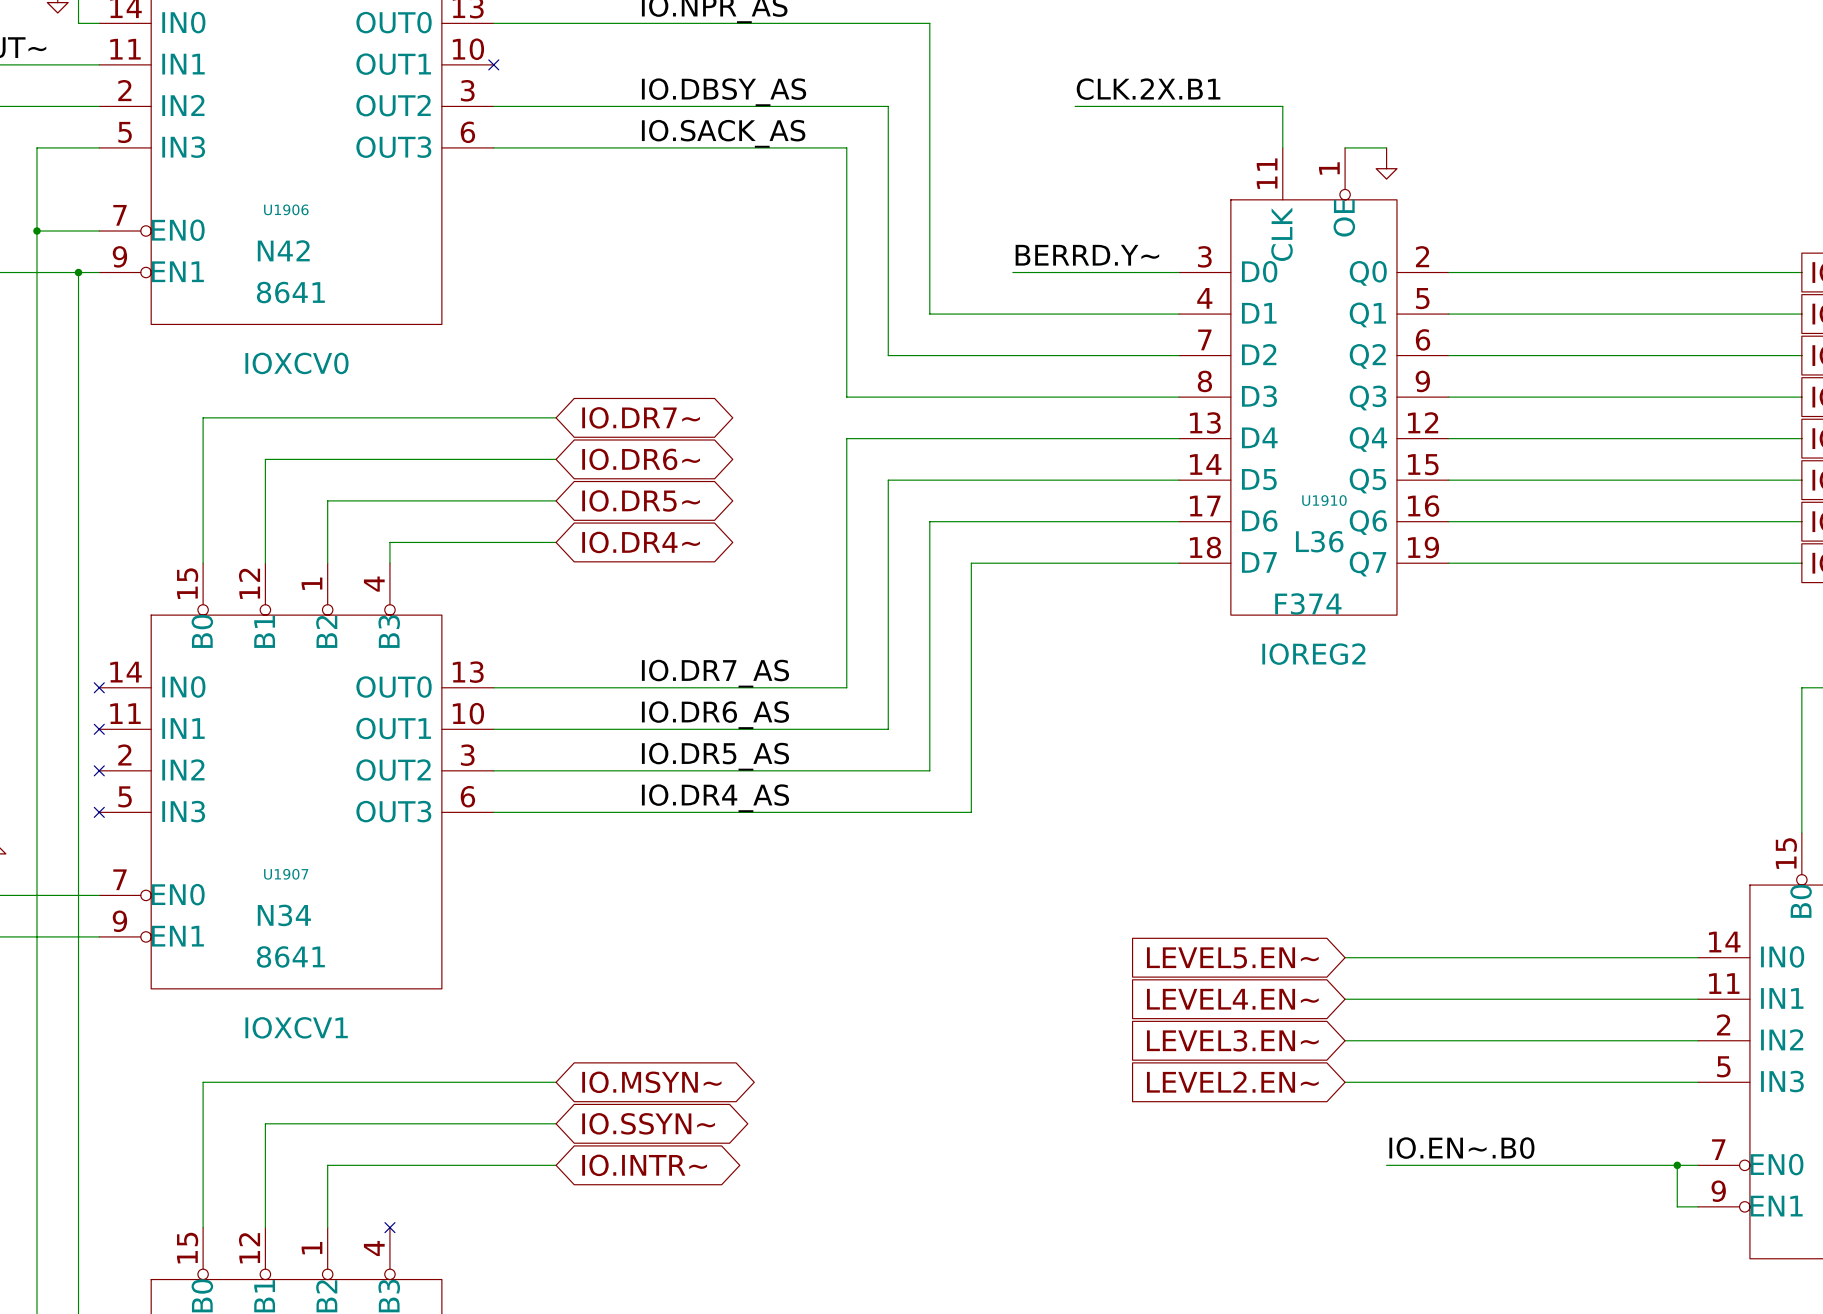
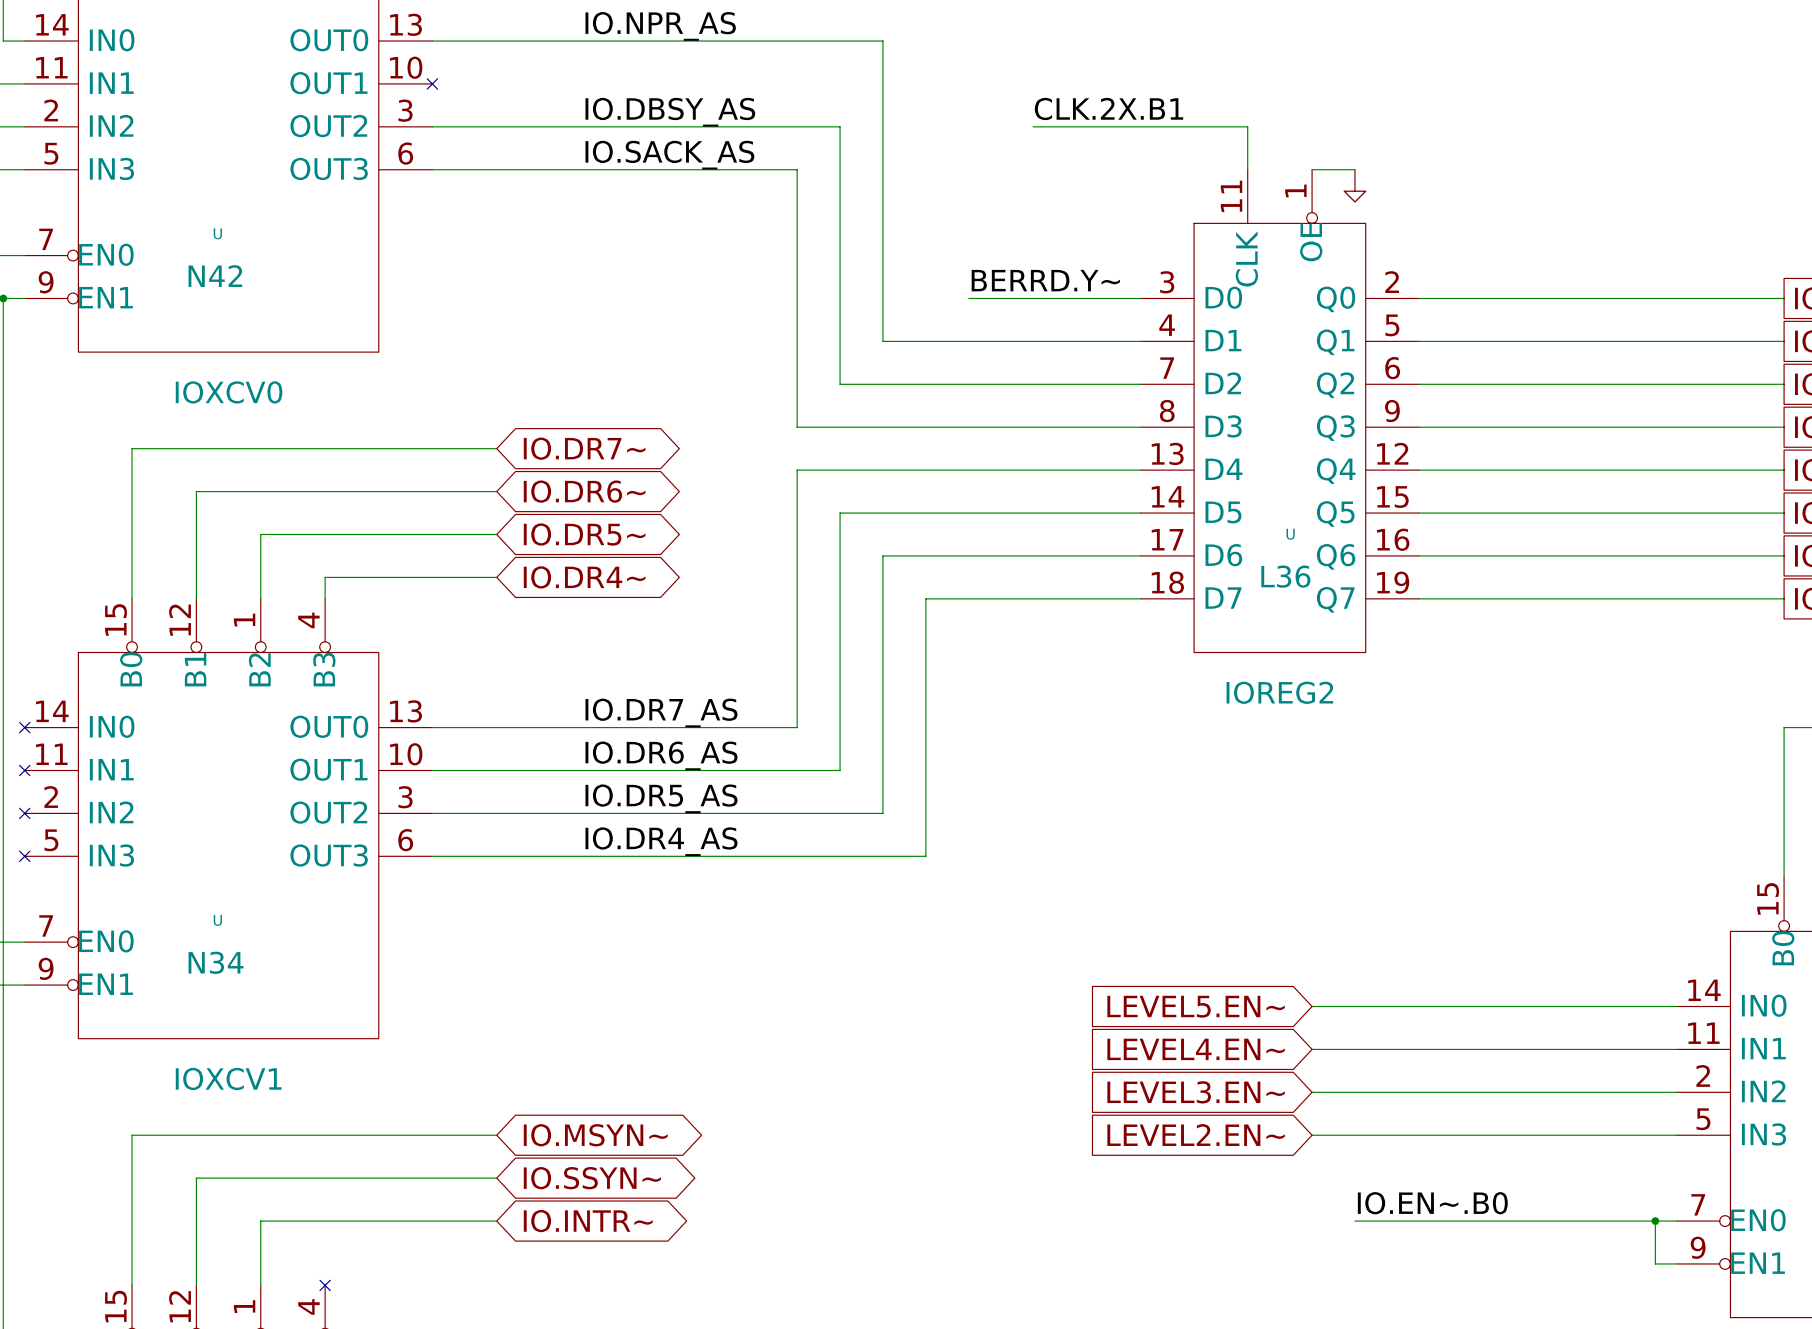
U1906 name: U1906 (286, 209) -> U (217, 233)
U1906 value: 8641 (290, 292) -> none
U1910 name: U1910 (1324, 500) -> U (1290, 534)
U1910 value: F374 (1308, 603) -> none
U1907 name: U1907 (286, 874) -> U (217, 920)
U1907 value: 8641 (290, 956) -> none

